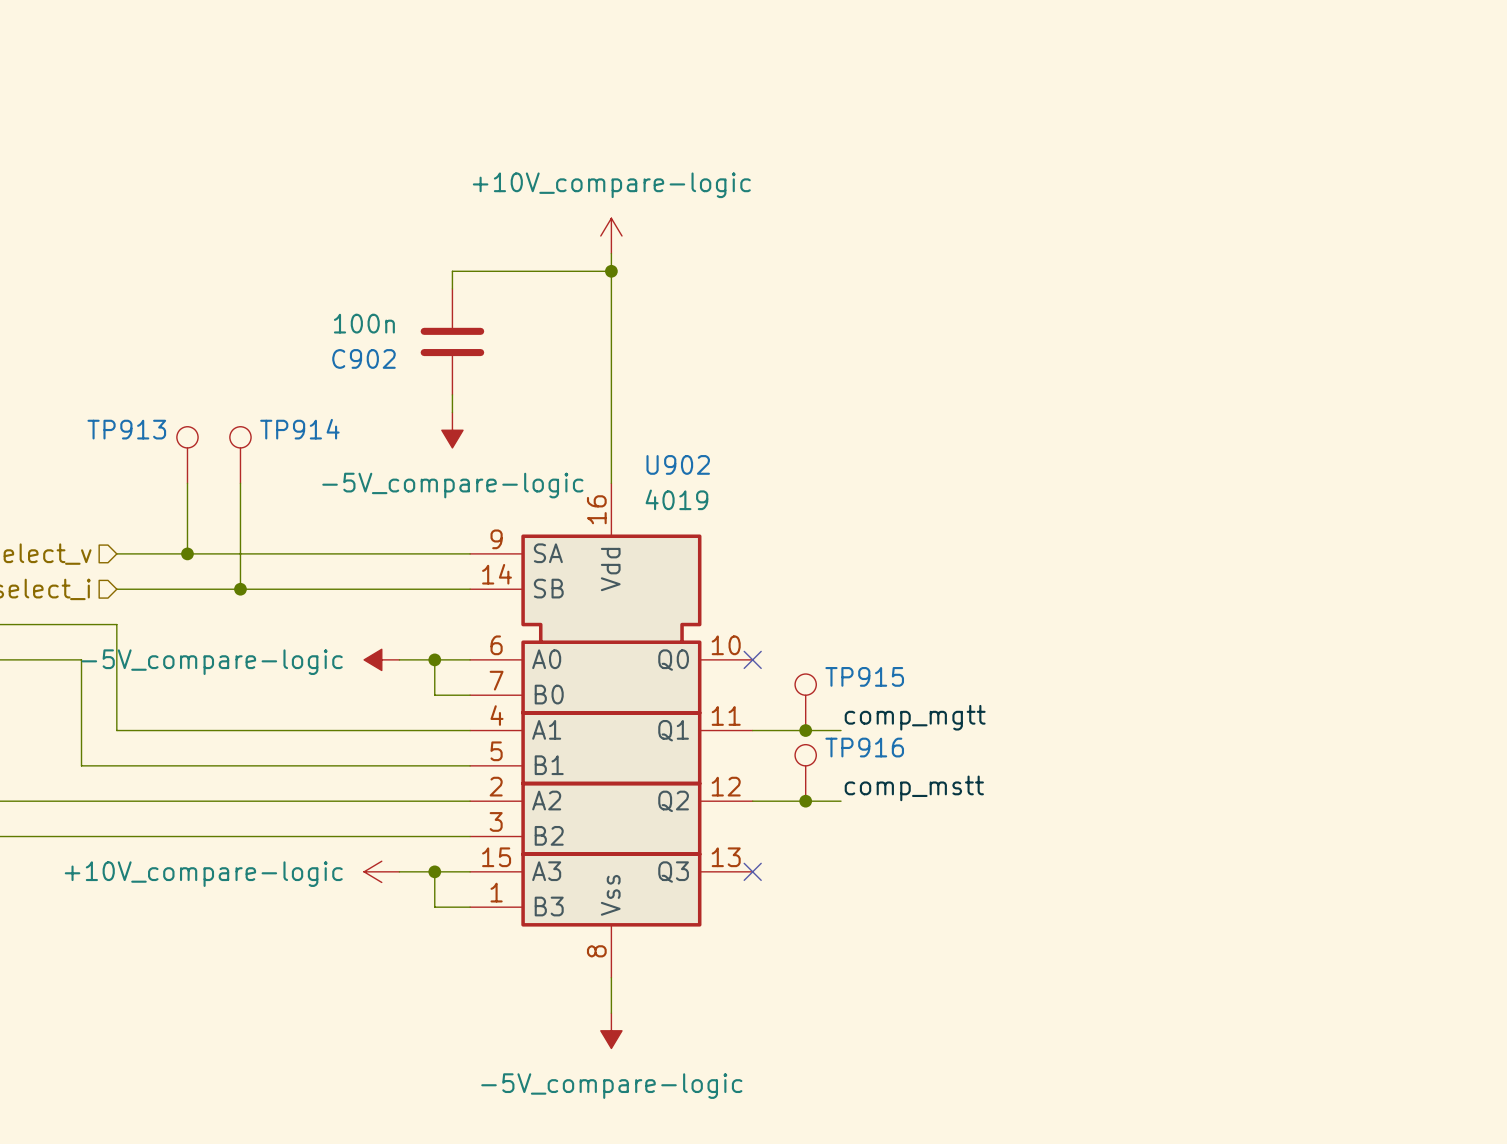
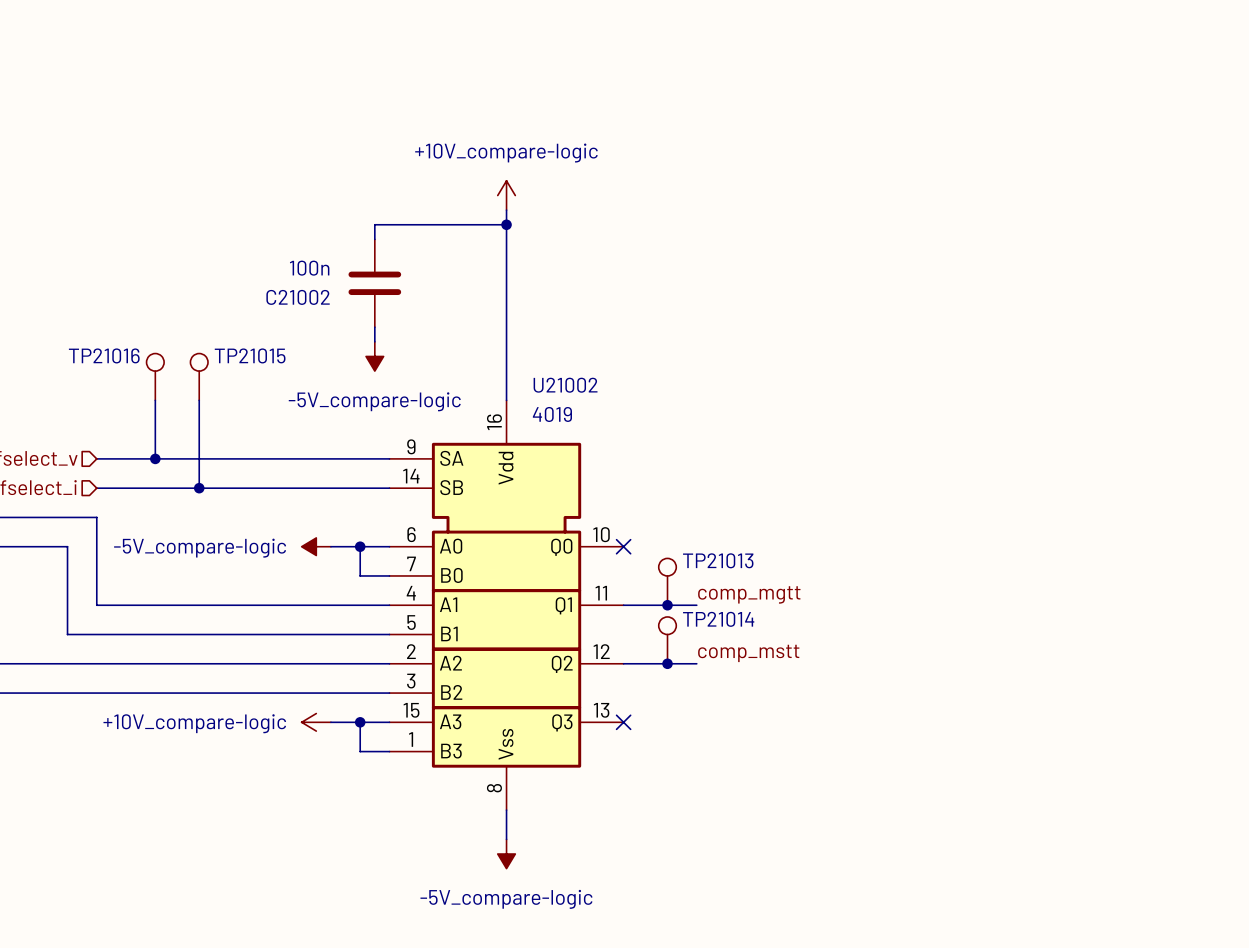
C902 name: C902 (363, 358) -> C21002 (298, 297)
TP913 name: TP913 (126, 429) -> TP21016 (104, 355)
TP914 name: TP914 (299, 429) -> TP21015 (250, 355)
U902 name: U902 (678, 464) -> U21002 (565, 385)
TP915 name: TP915 (864, 676) -> TP21013 (718, 560)
TP916 name: TP916 (864, 747) -> TP21014 (718, 619)

